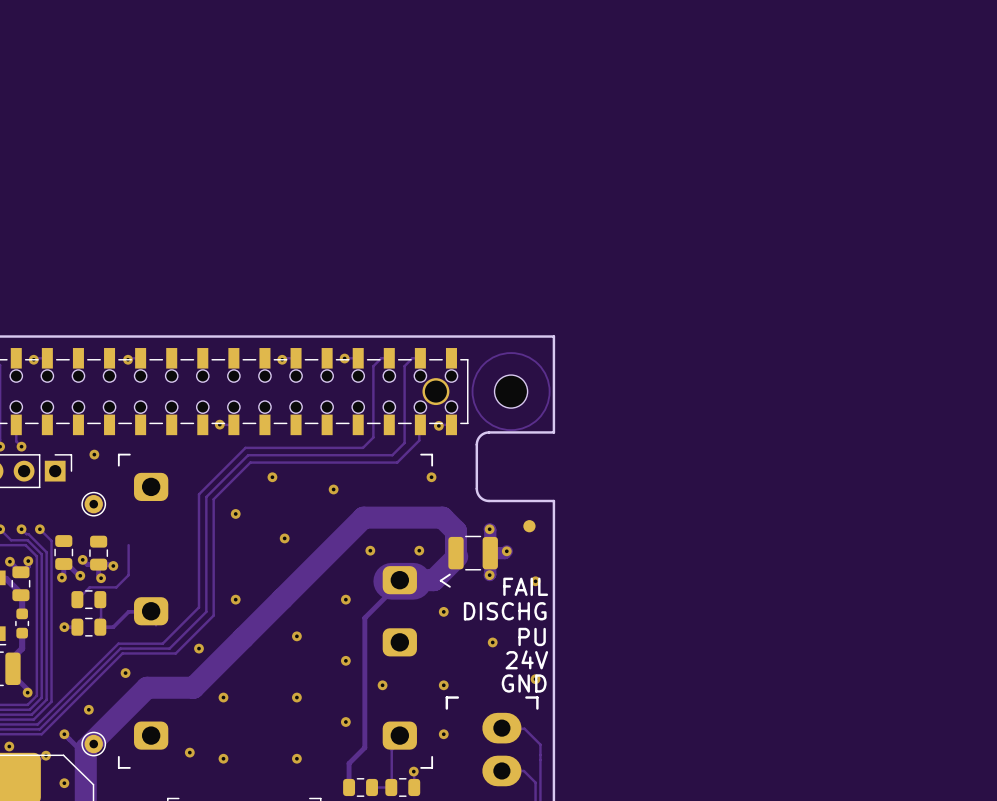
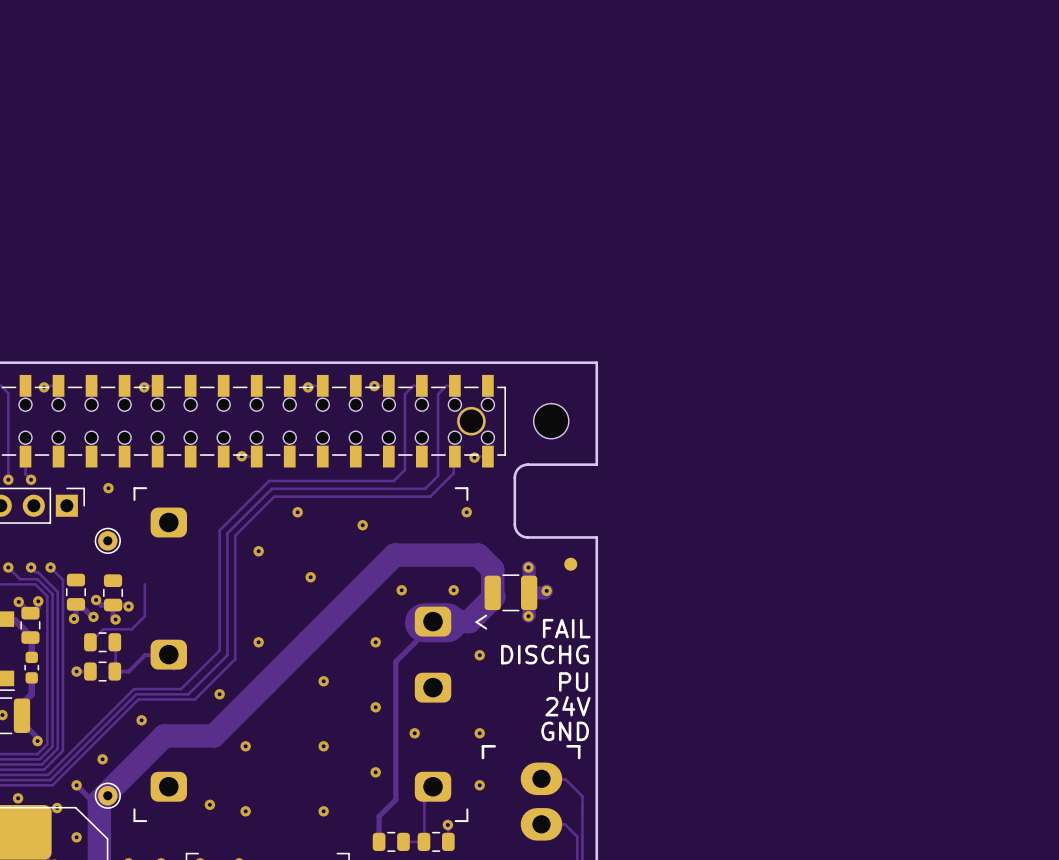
part footprint: [471, 352, 551, 432] -> [533, 403, 569, 439]
via: (535, 581) -> none
via: (492, 642) -> none
via: (535, 679) -> none

